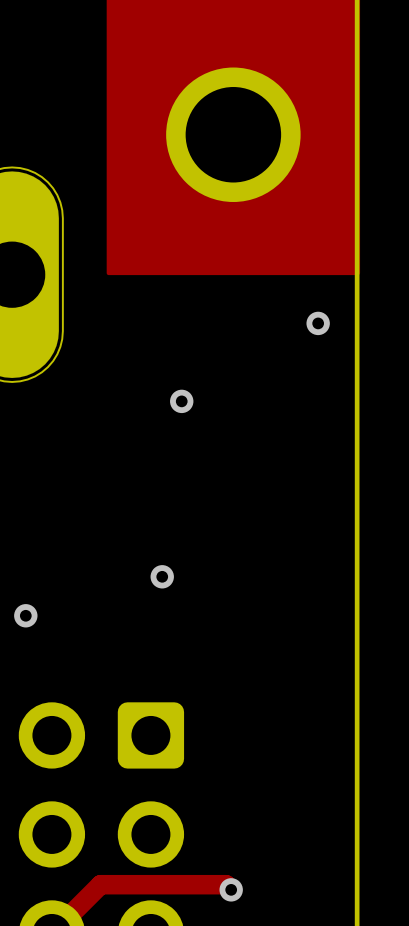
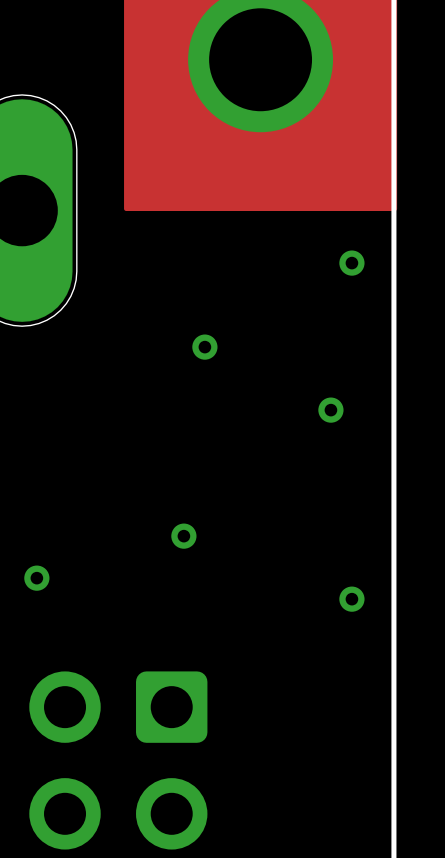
via: none -> (330, 410)
via: none -> (351, 599)

